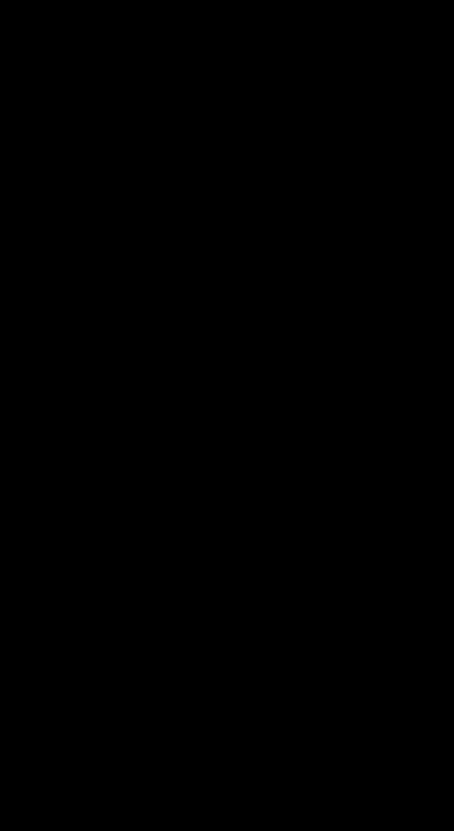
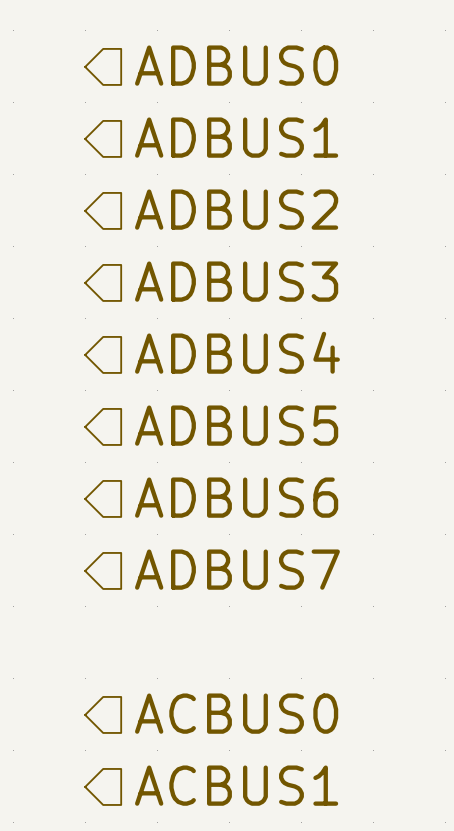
hierarchical label: none -> ADBUS0 (236, 65)
hierarchical label: none -> ADBUS1 (236, 137)
hierarchical label: none -> ADBUS2 (236, 209)
hierarchical label: none -> ADBUS3 (236, 281)
hierarchical label: none -> ADBUS4 (237, 352)
hierarchical label: none -> ADBUS5 (236, 425)
hierarchical label: none -> ADBUS6 (236, 497)
hierarchical label: none -> ADBUS7 (237, 569)
hierarchical label: none -> ACBUS0 (236, 713)
hierarchical label: none -> ACBUS1 (236, 785)

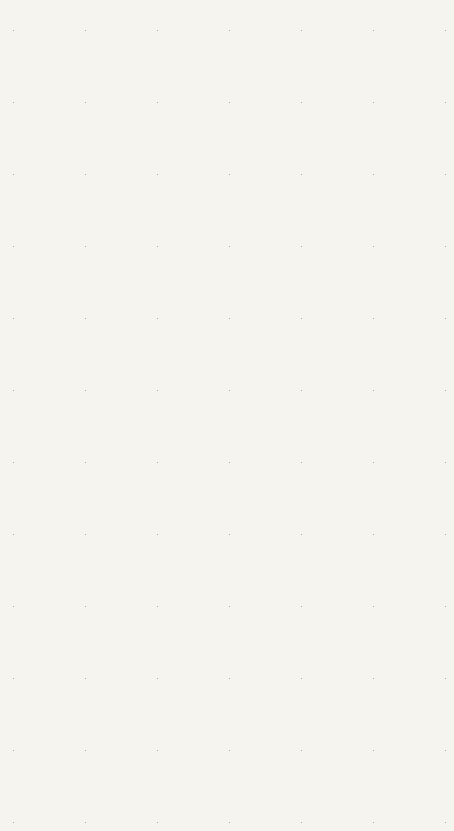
hierarchical label: ADBUS0 (236, 65) -> none
hierarchical label: ADBUS1 (236, 137) -> none
hierarchical label: ADBUS2 (236, 209) -> none
hierarchical label: ADBUS3 (236, 281) -> none
hierarchical label: ADBUS4 (237, 352) -> none
hierarchical label: ADBUS5 (236, 425) -> none
hierarchical label: ADBUS6 (236, 497) -> none
hierarchical label: ADBUS7 (237, 569) -> none
hierarchical label: ACBUS0 (236, 713) -> none
hierarchical label: ACBUS1 (236, 785) -> none

